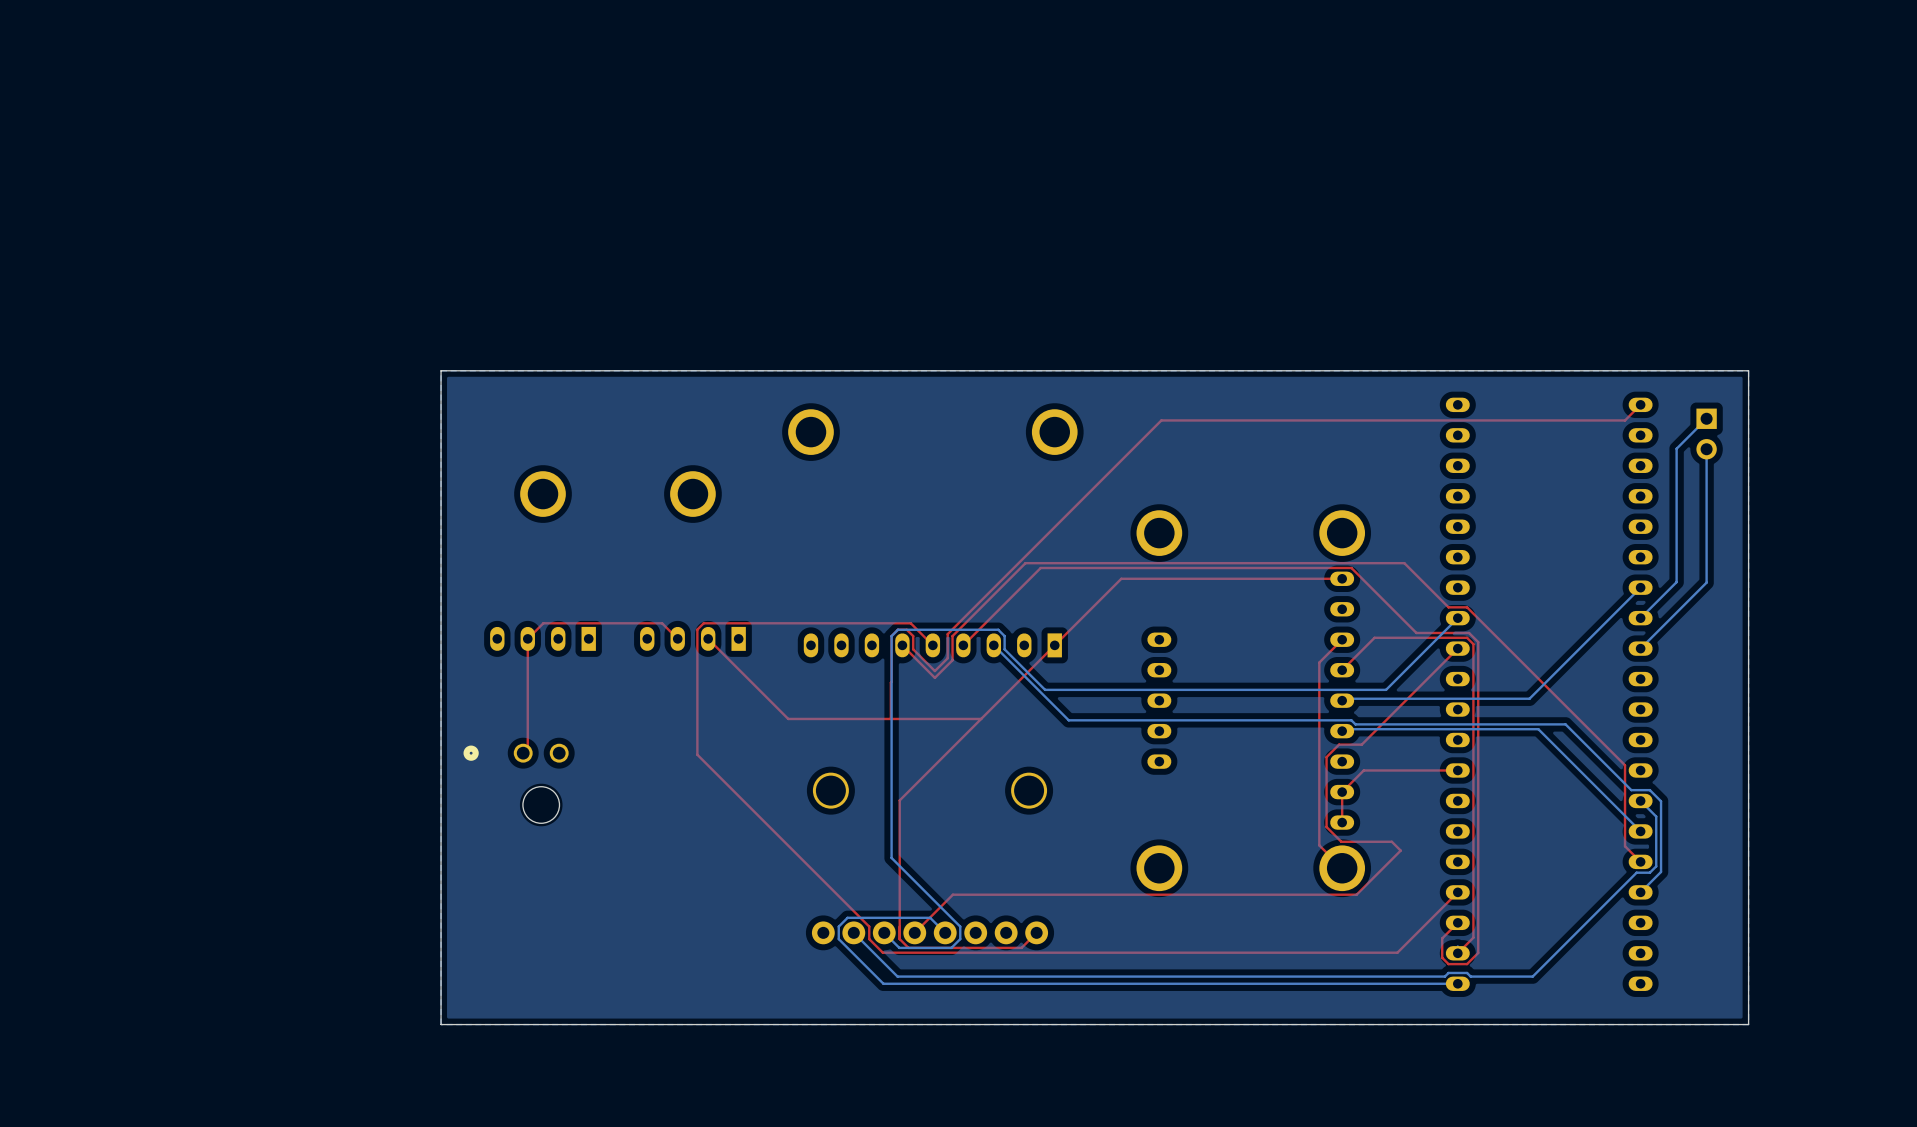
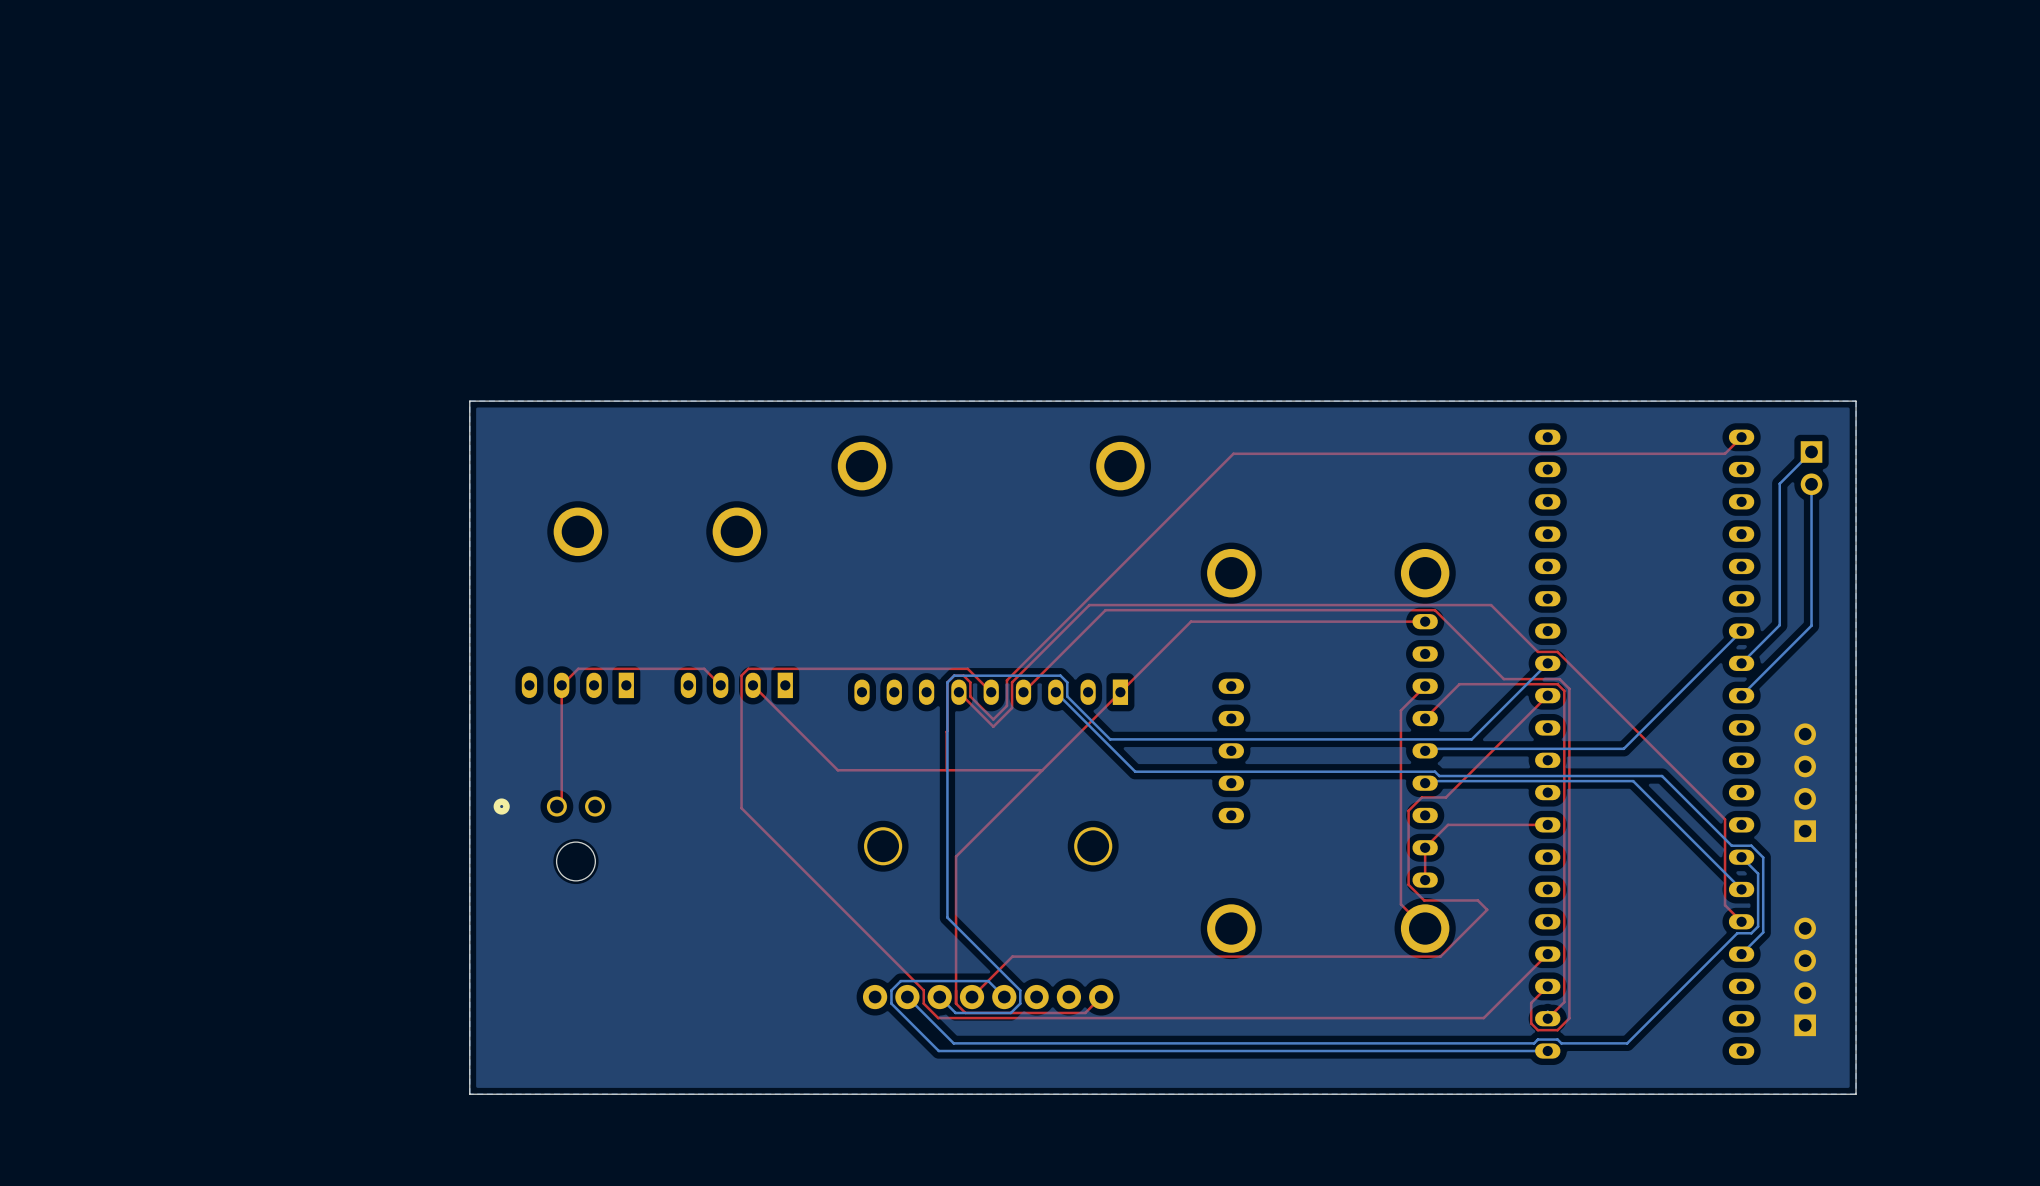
part: none -> (1805, 782)
part: none -> (1805, 976)

